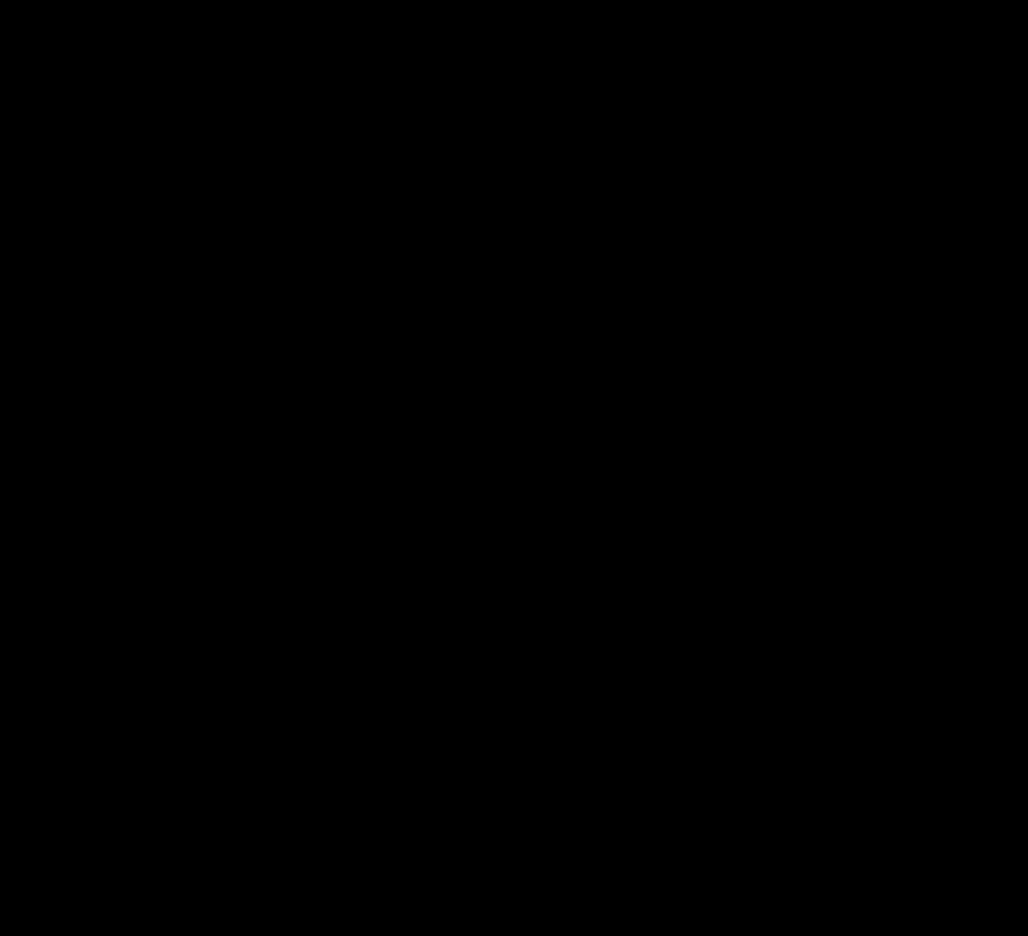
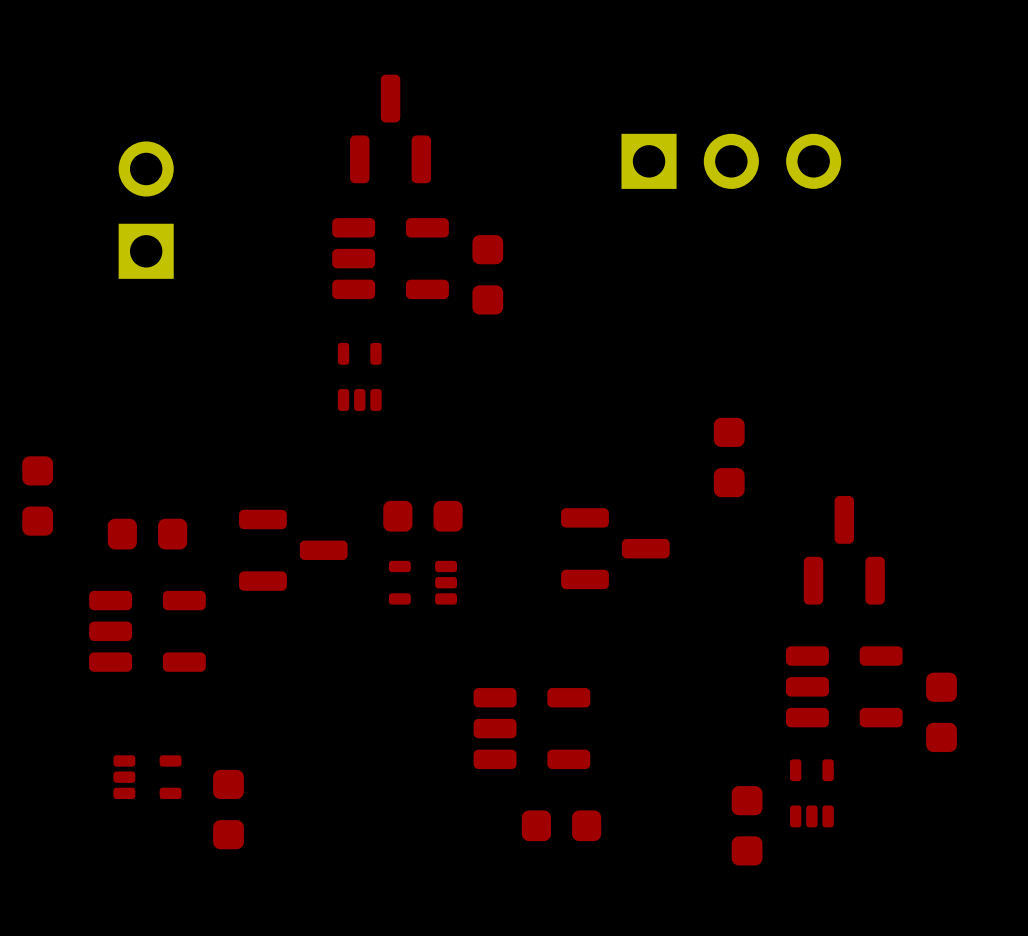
part: none -> (390, 128)
part: none -> (731, 161)
part: none -> (146, 210)
part: none -> (390, 258)
part: none -> (487, 274)
part: none -> (359, 376)
part: none -> (729, 457)
part: none -> (37, 496)
part: none -> (422, 516)
part: none -> (147, 534)
part: none -> (615, 548)
part: none -> (293, 550)
part: none -> (844, 550)
part: none -> (422, 582)
part: none -> (147, 631)
part: none -> (844, 686)
part: none -> (941, 712)
part: none -> (531, 728)
part: none -> (147, 777)
part: none -> (811, 793)
part: none -> (228, 809)
part: none -> (561, 825)
part: none -> (747, 825)

